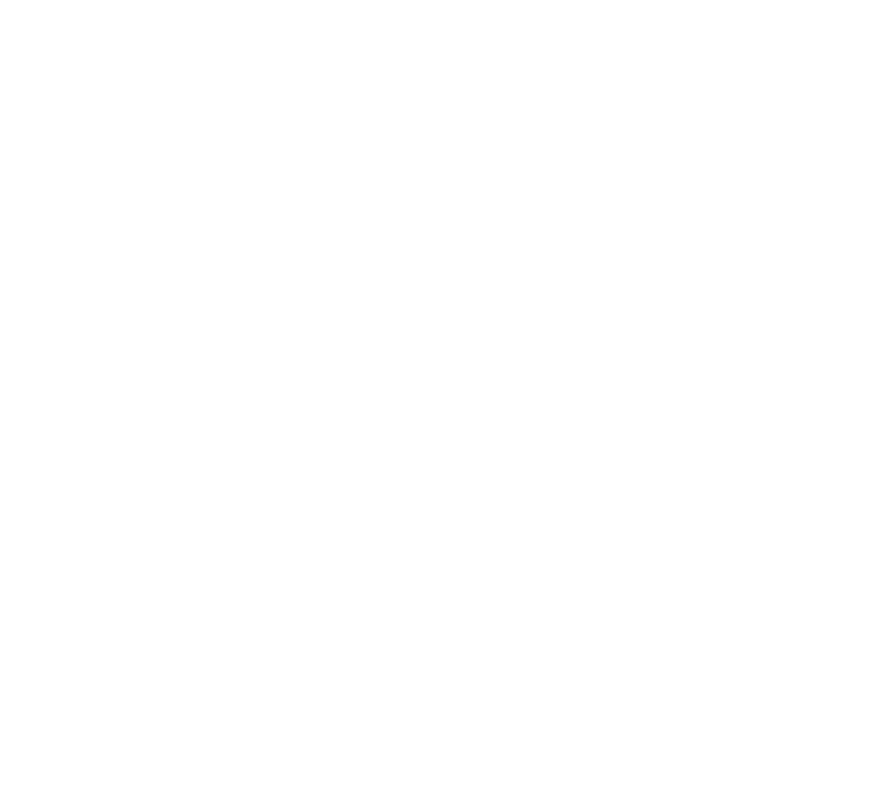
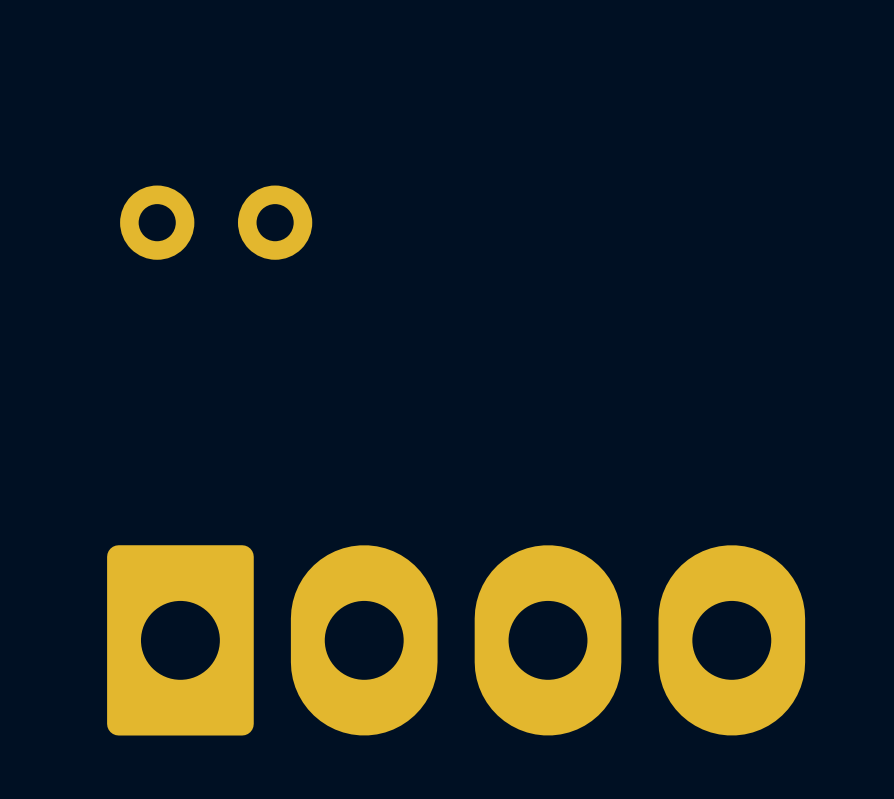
part: none -> (216, 222)
part: none -> (456, 640)

